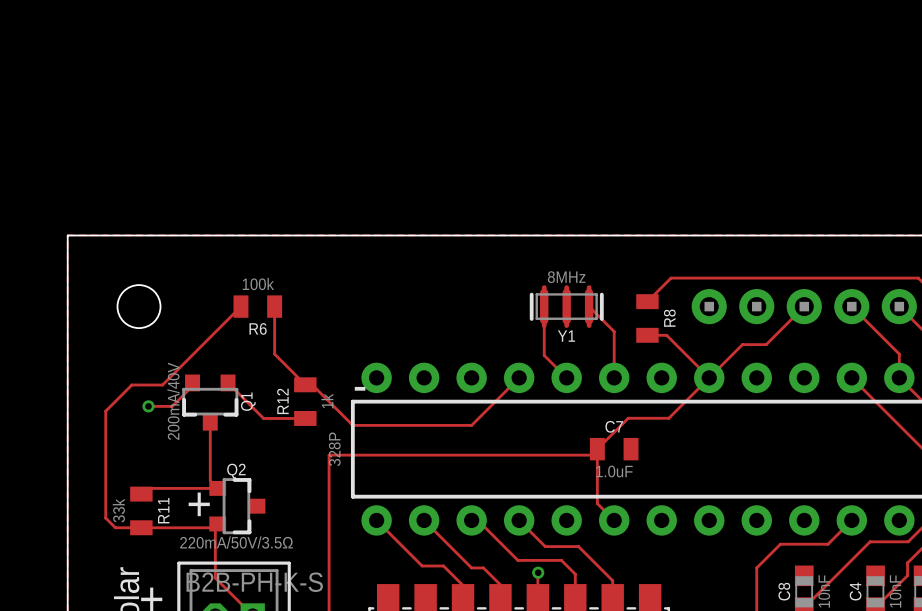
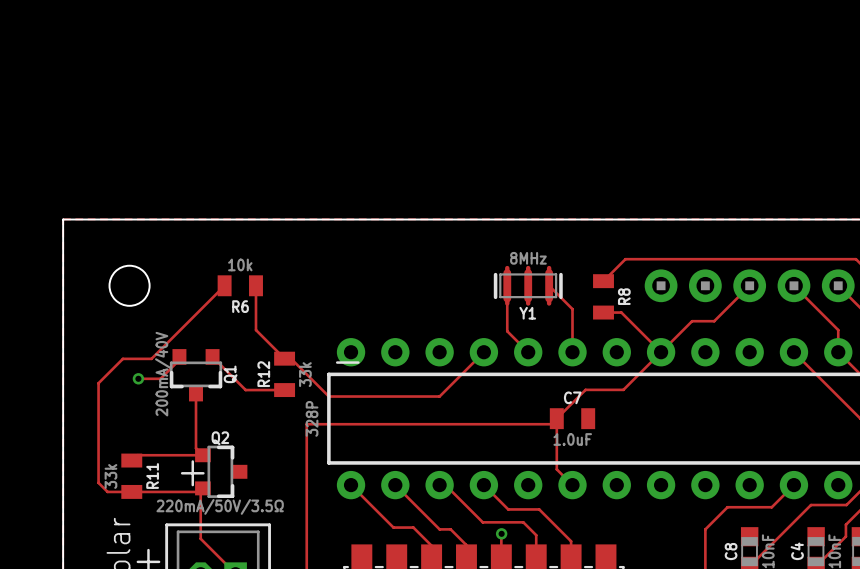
R6 value: 100k (258, 284) -> 10k (240, 264)
R12 value: 1k (327, 401) -> 33k (305, 374)
part value: B2B-PH-K-S (254, 582) -> none

